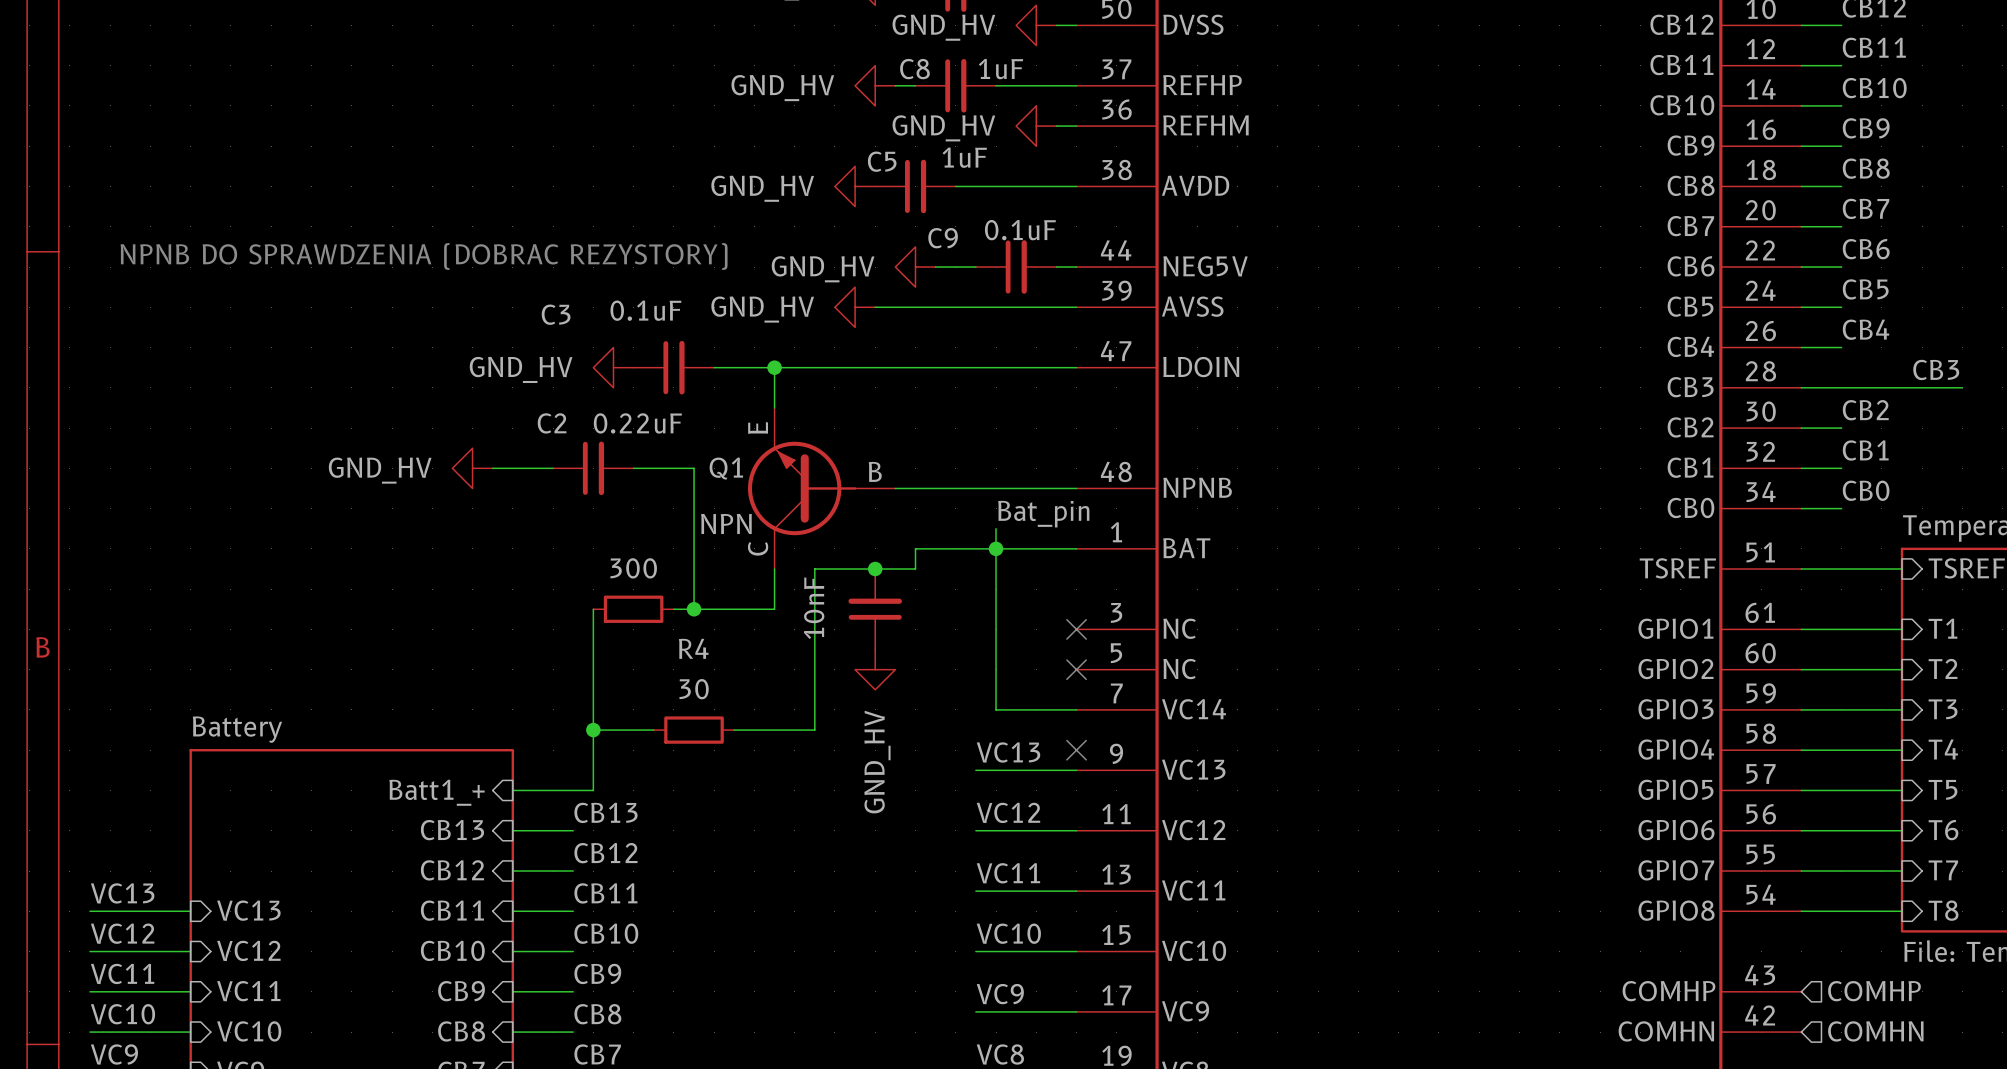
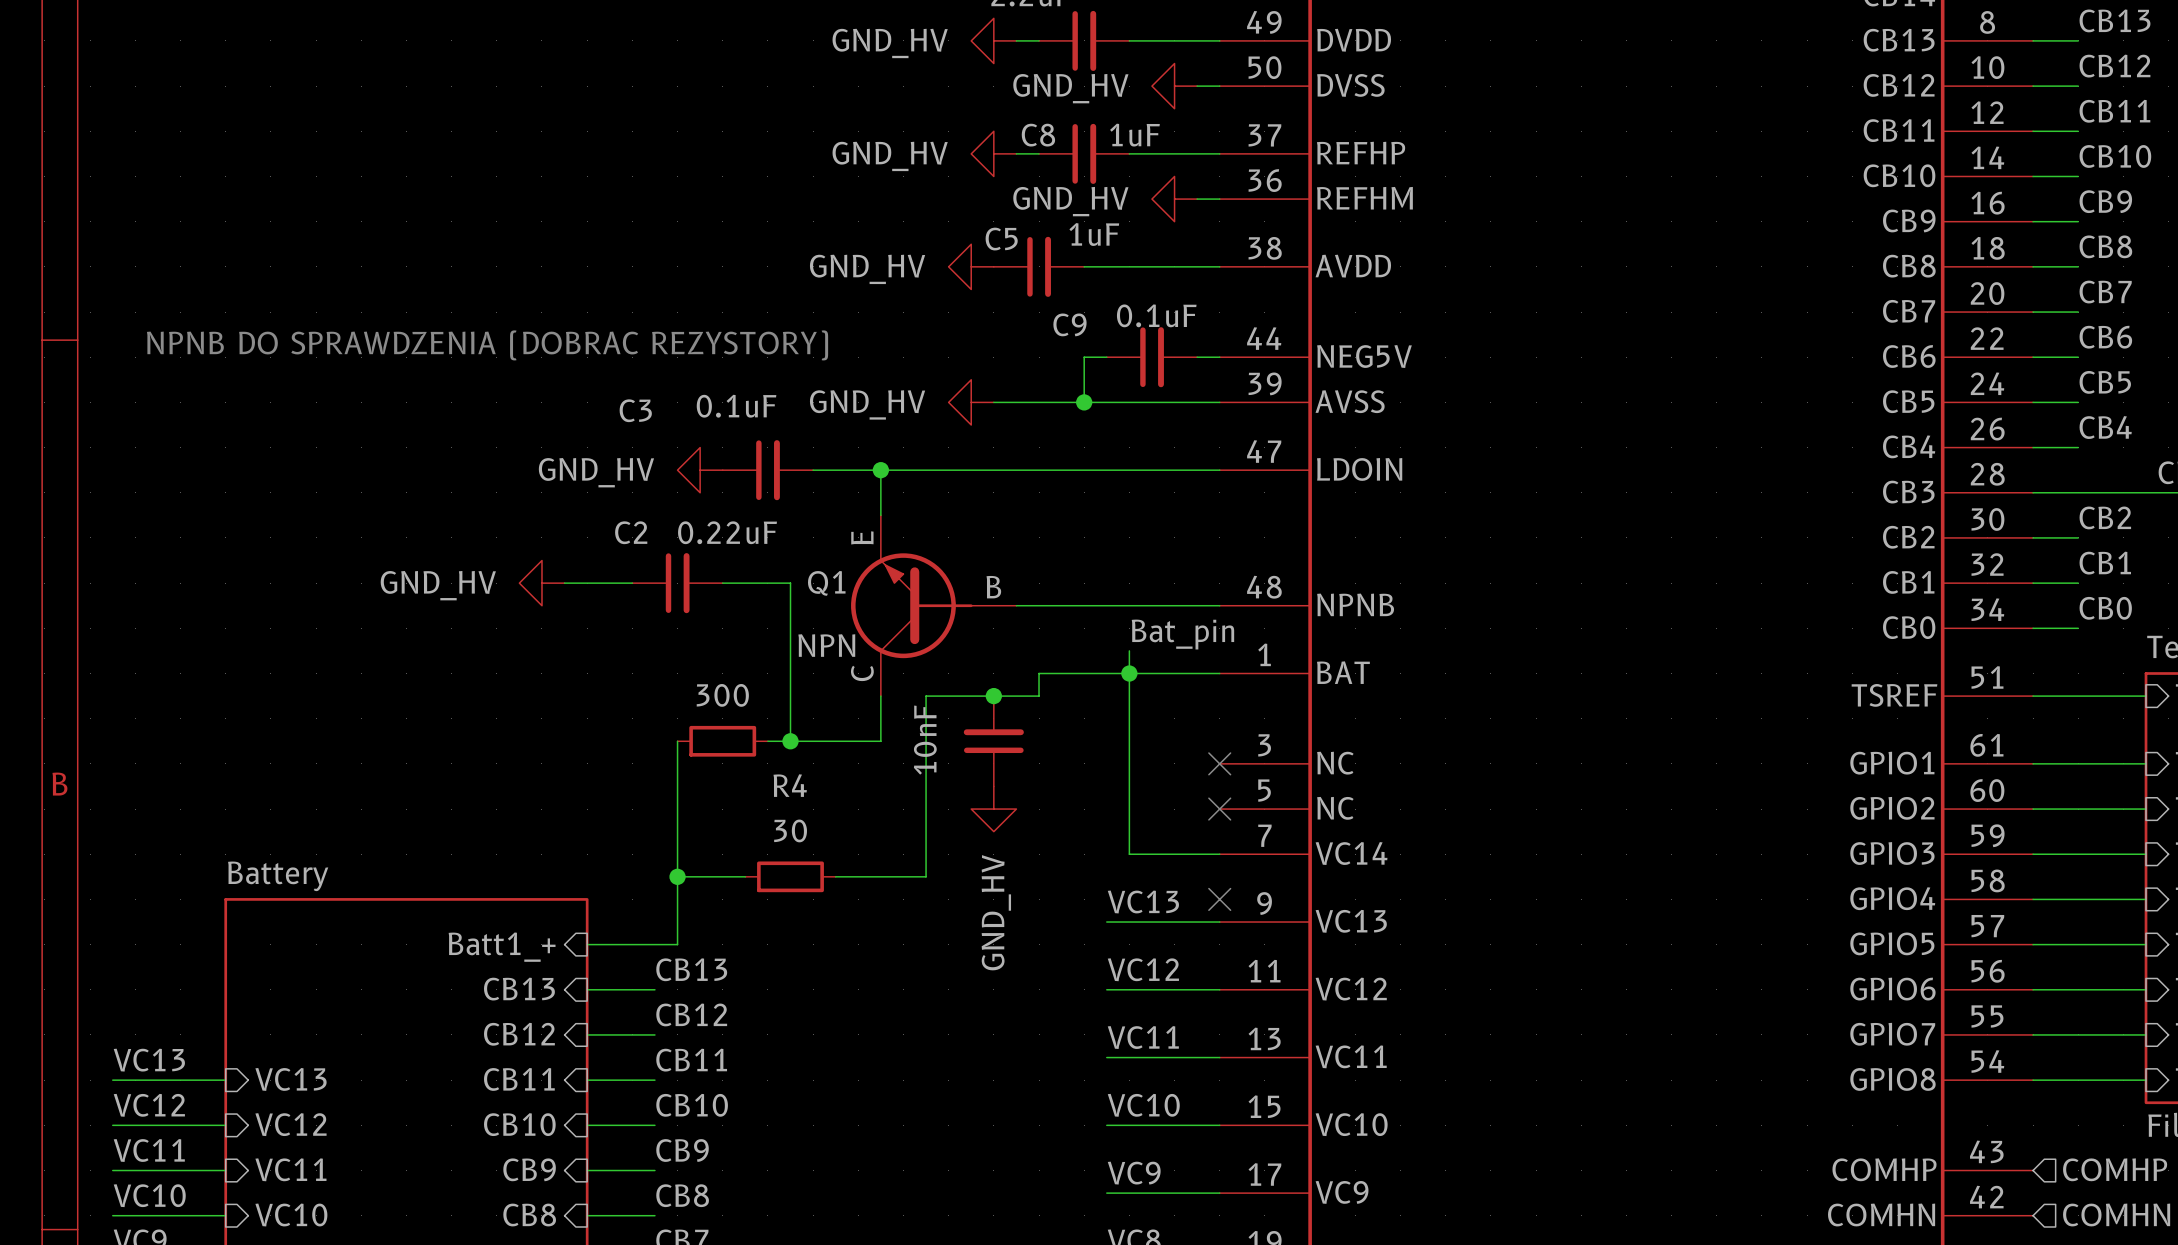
power symbol: GND_HV (915, 267) -> none
wire: (935, 267) (955, 267) -> (1084, 402) (1084, 357)
junction: none -> (1084, 402)

